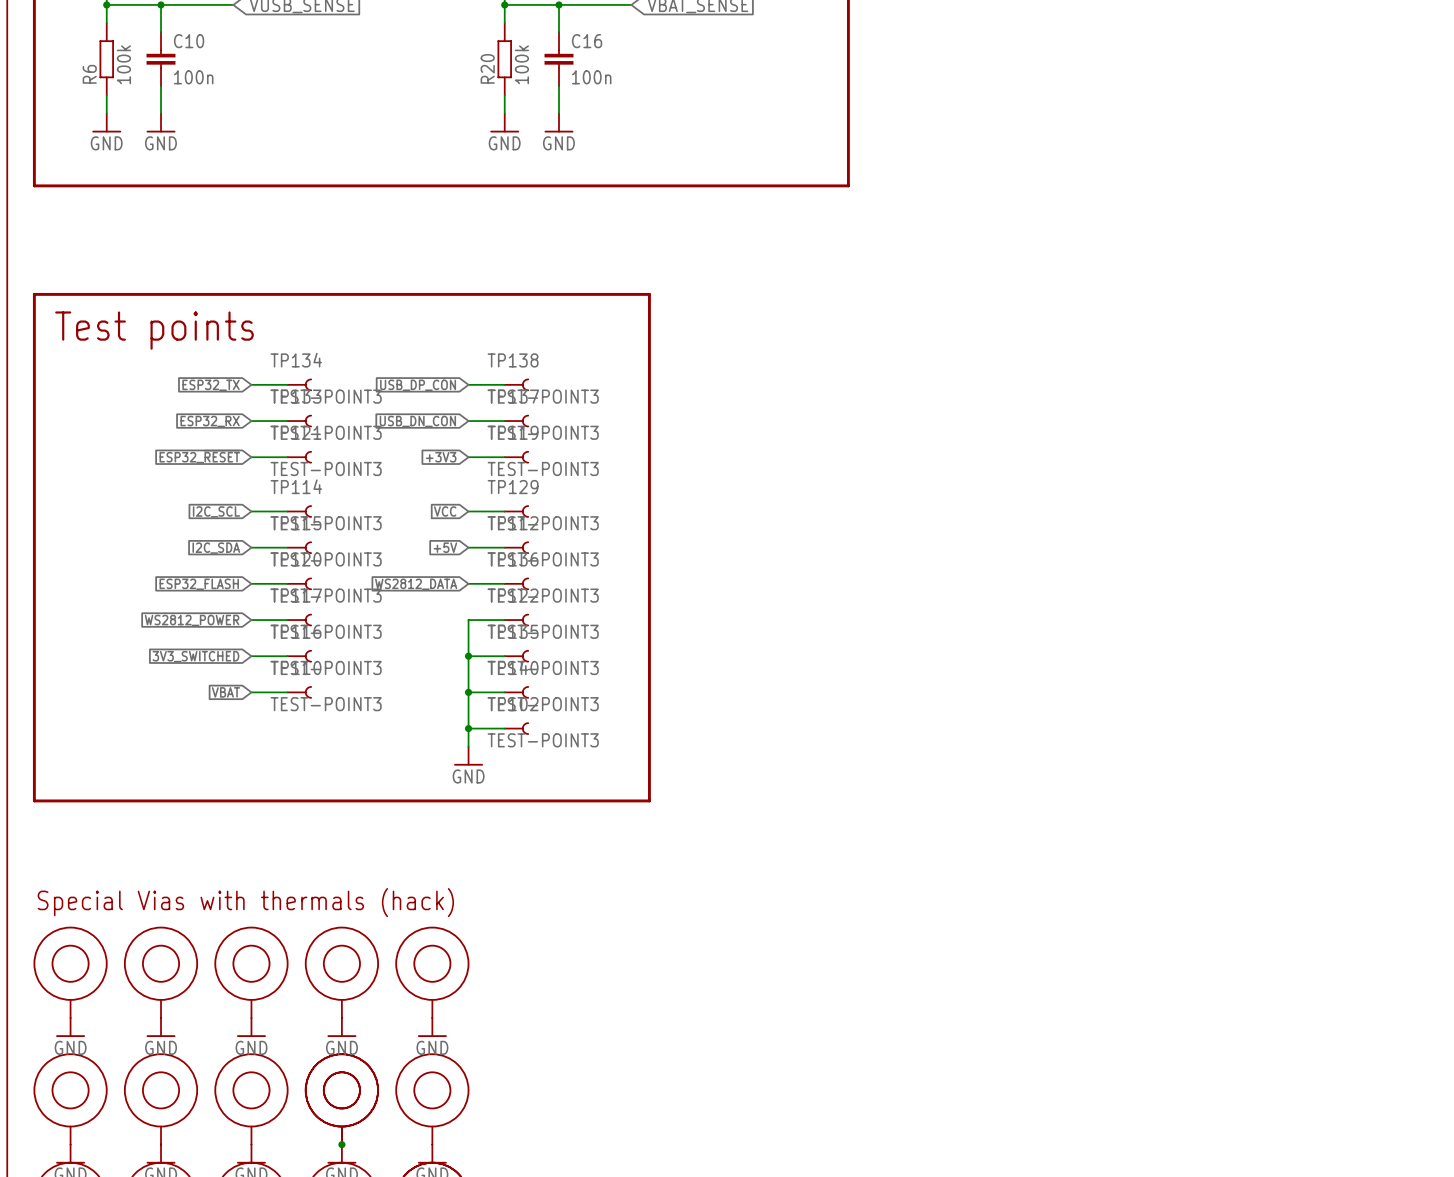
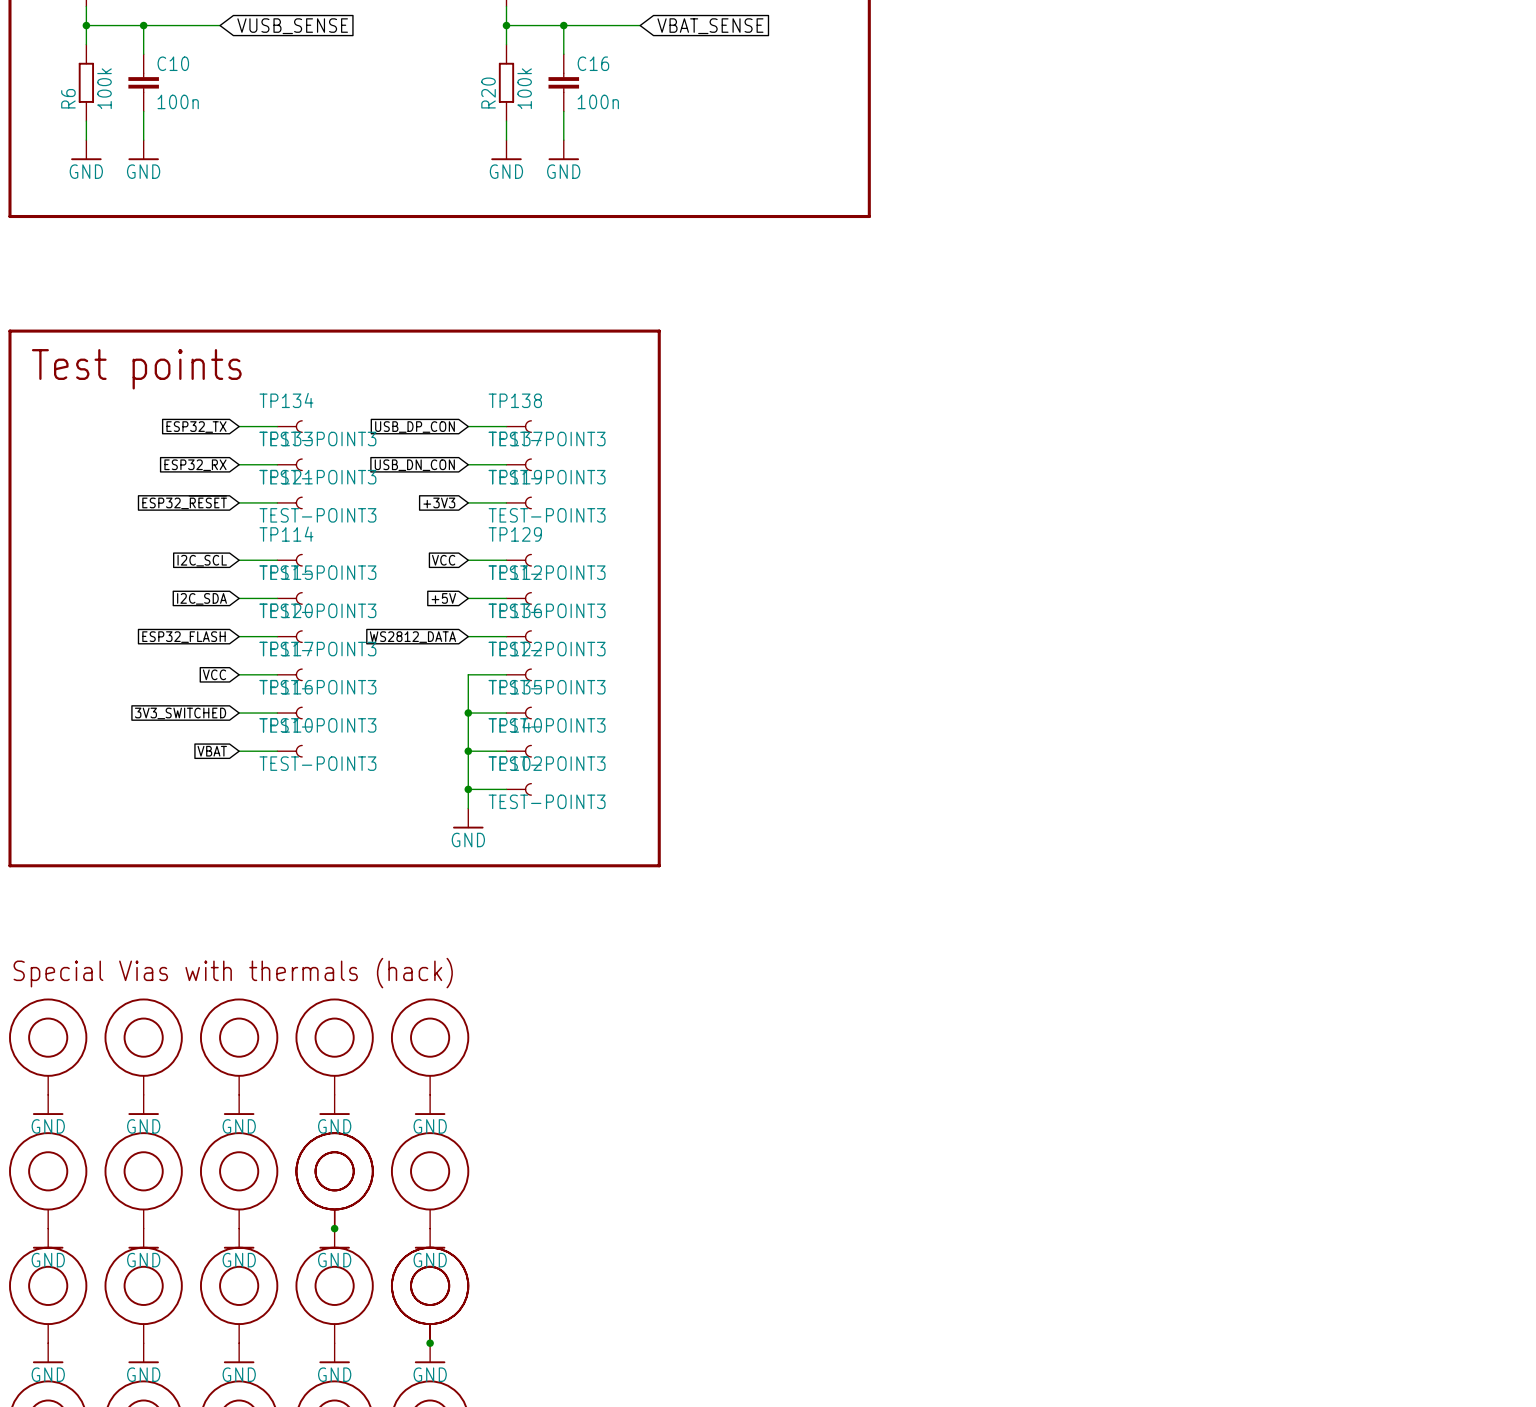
global label: WS2812_POWER (192, 620) -> VCC (214, 674)

